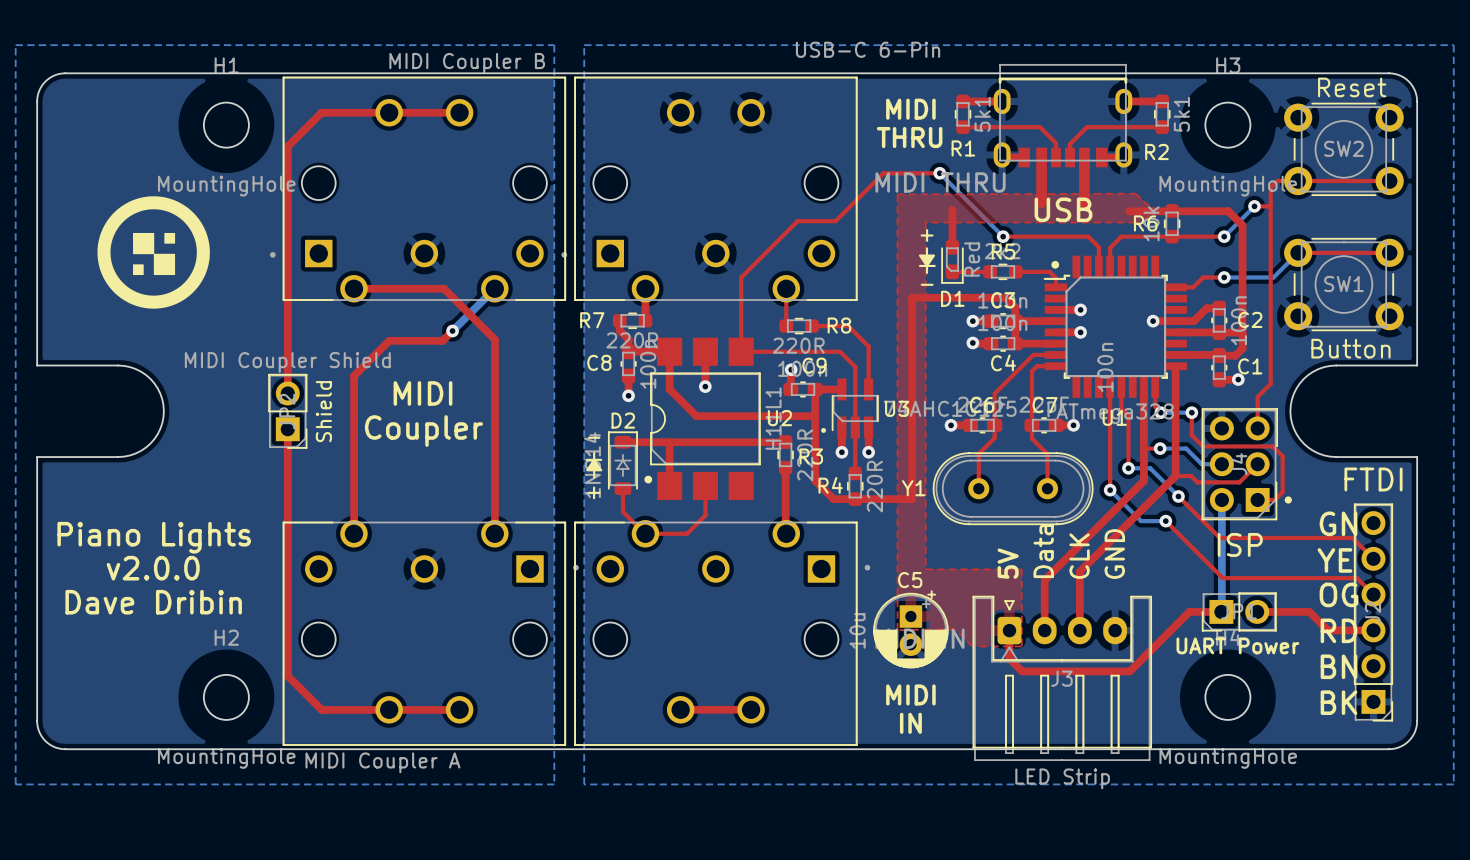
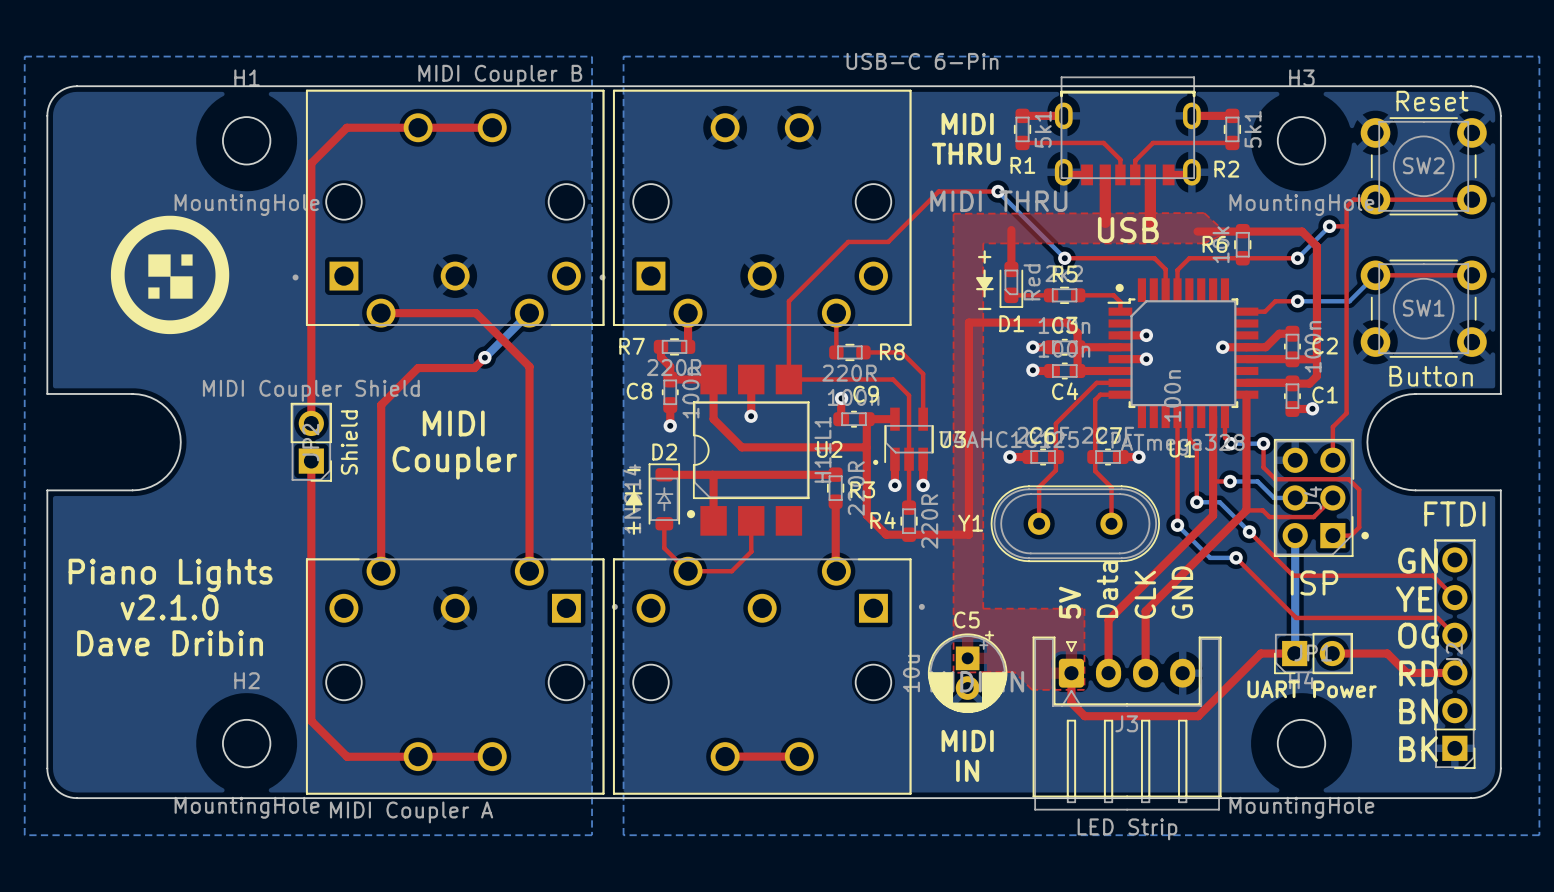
text: v2.0.0 (153, 568) -> v2.1.0 (169, 607)

